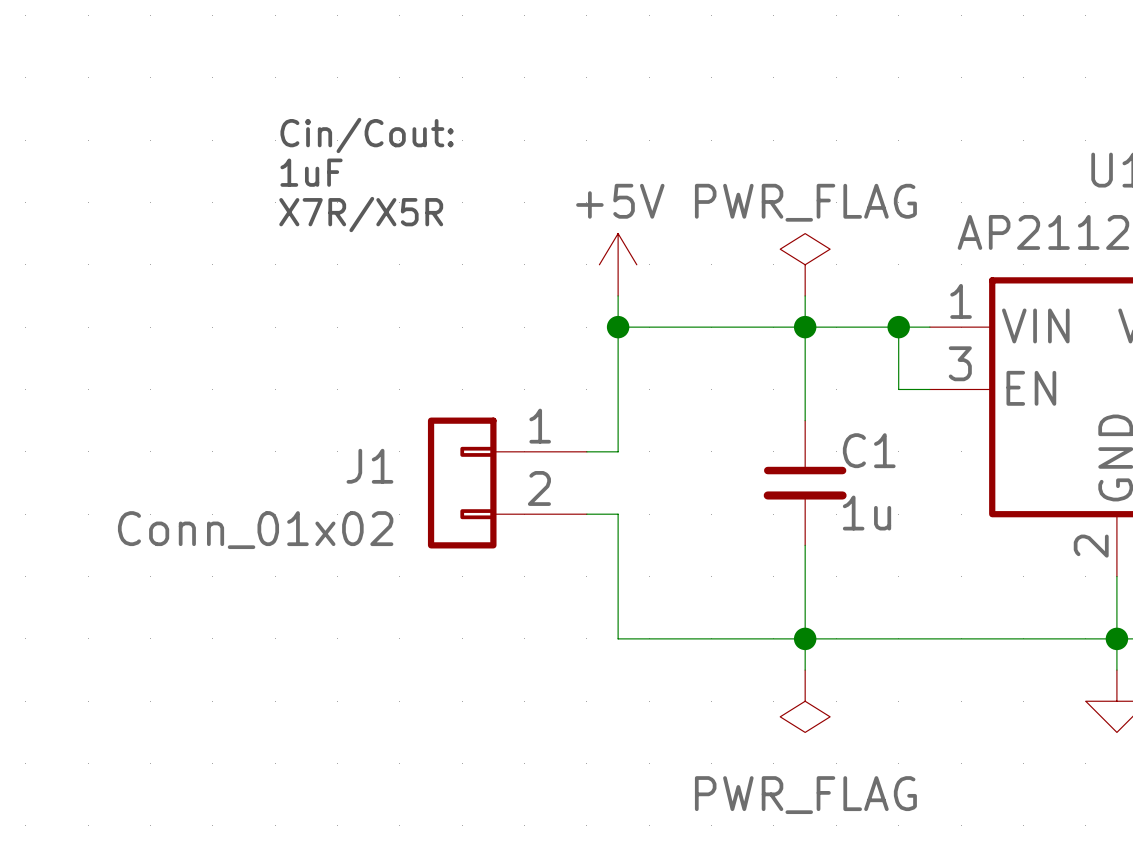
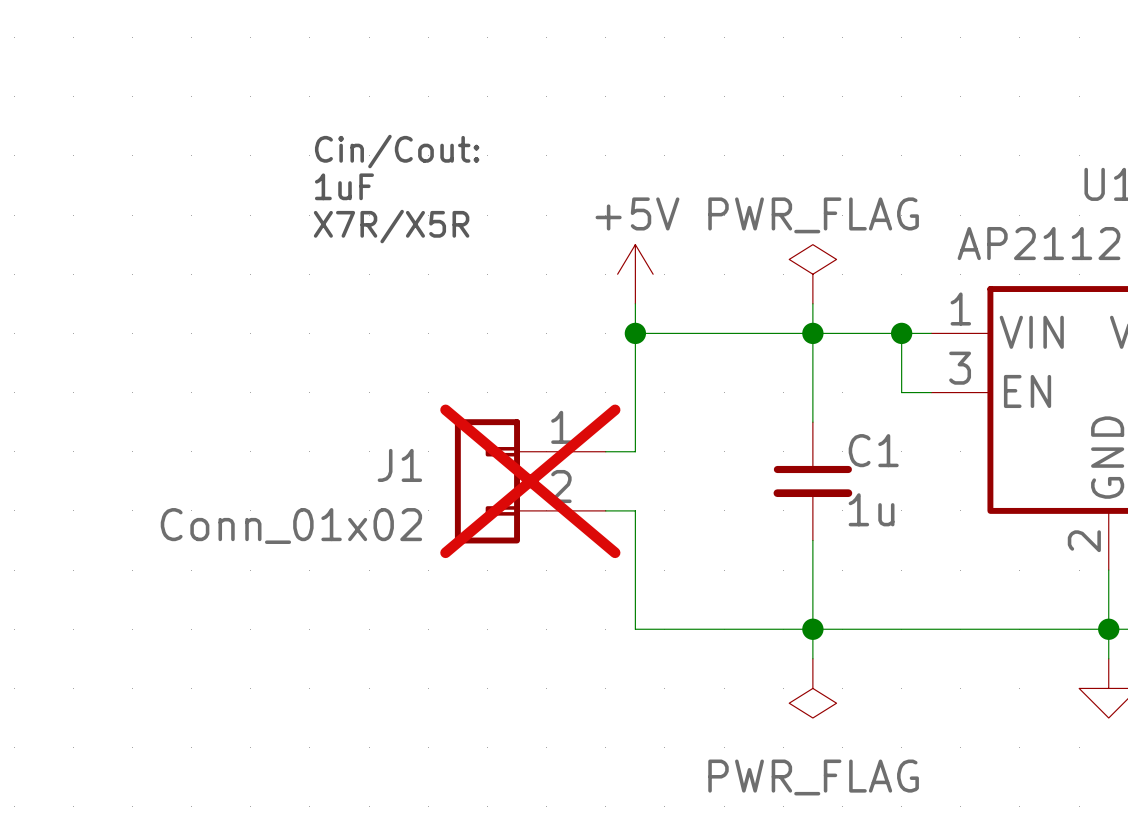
J1 do-not-place cross: none -> (530, 481)

